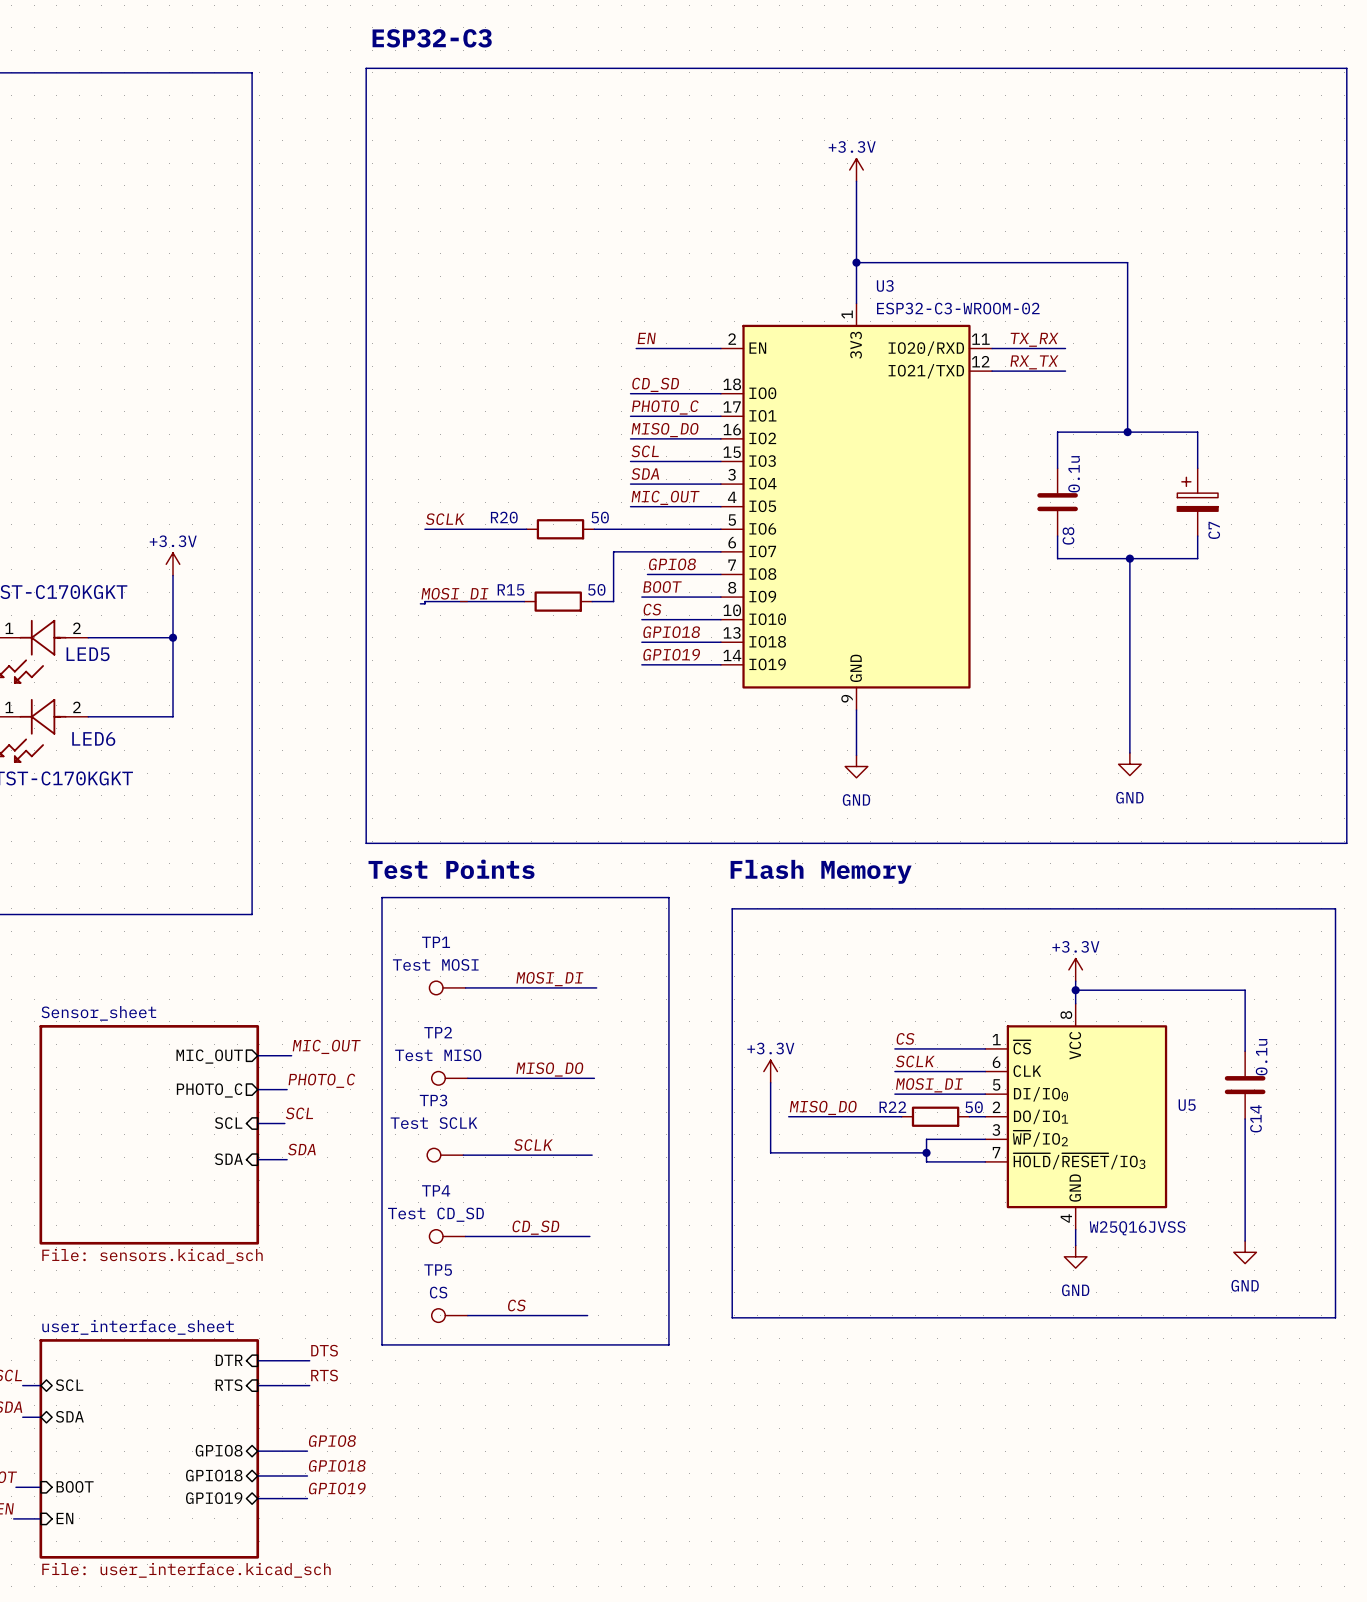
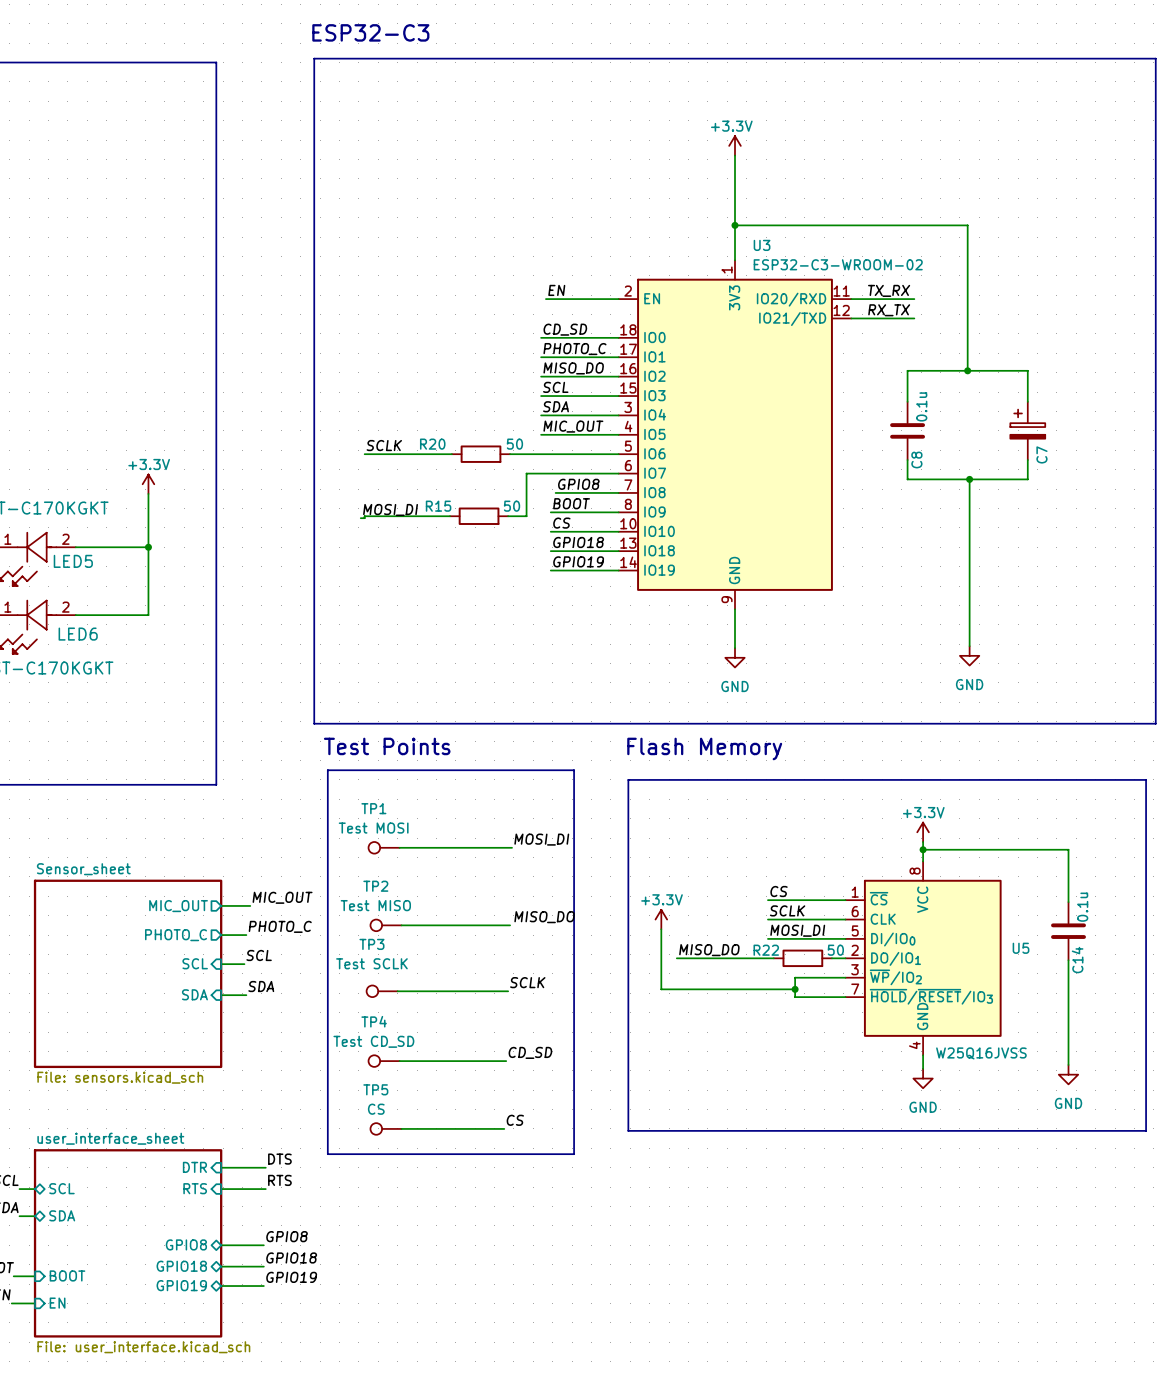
label position: MOSI_DI (549, 979) -> MOSI_DI (541, 839)
label position: MISO_DO (549, 1069) -> MISO_DO (544, 917)
label position: SCLK (533, 1145) -> SCLK (527, 982)
label position: CD_SD (535, 1227) -> CD_SD (530, 1052)
label position: CS (516, 1305) -> CS (515, 1120)

